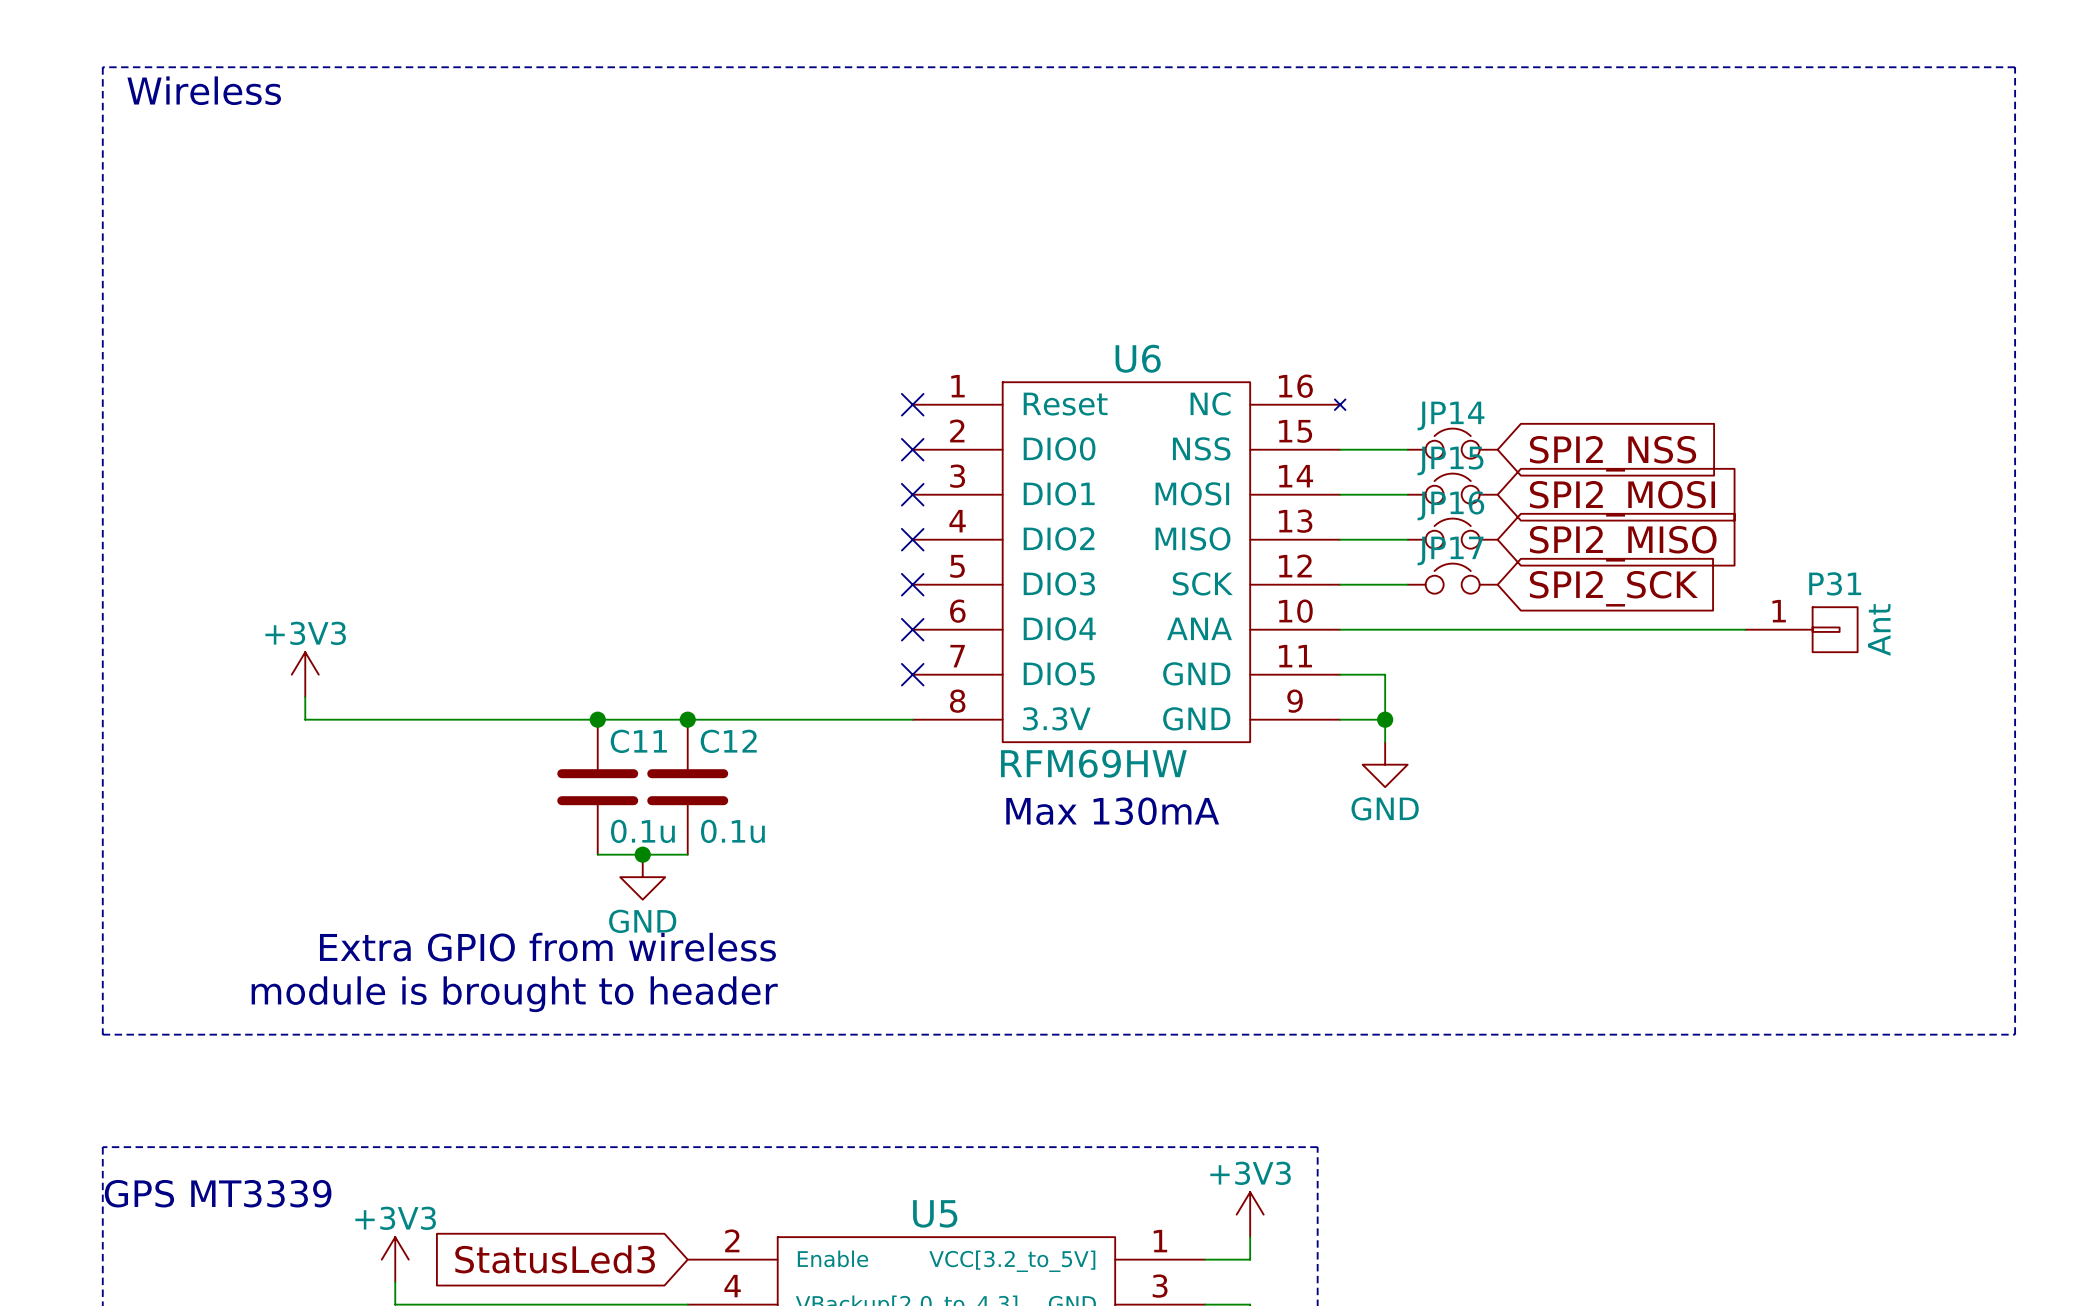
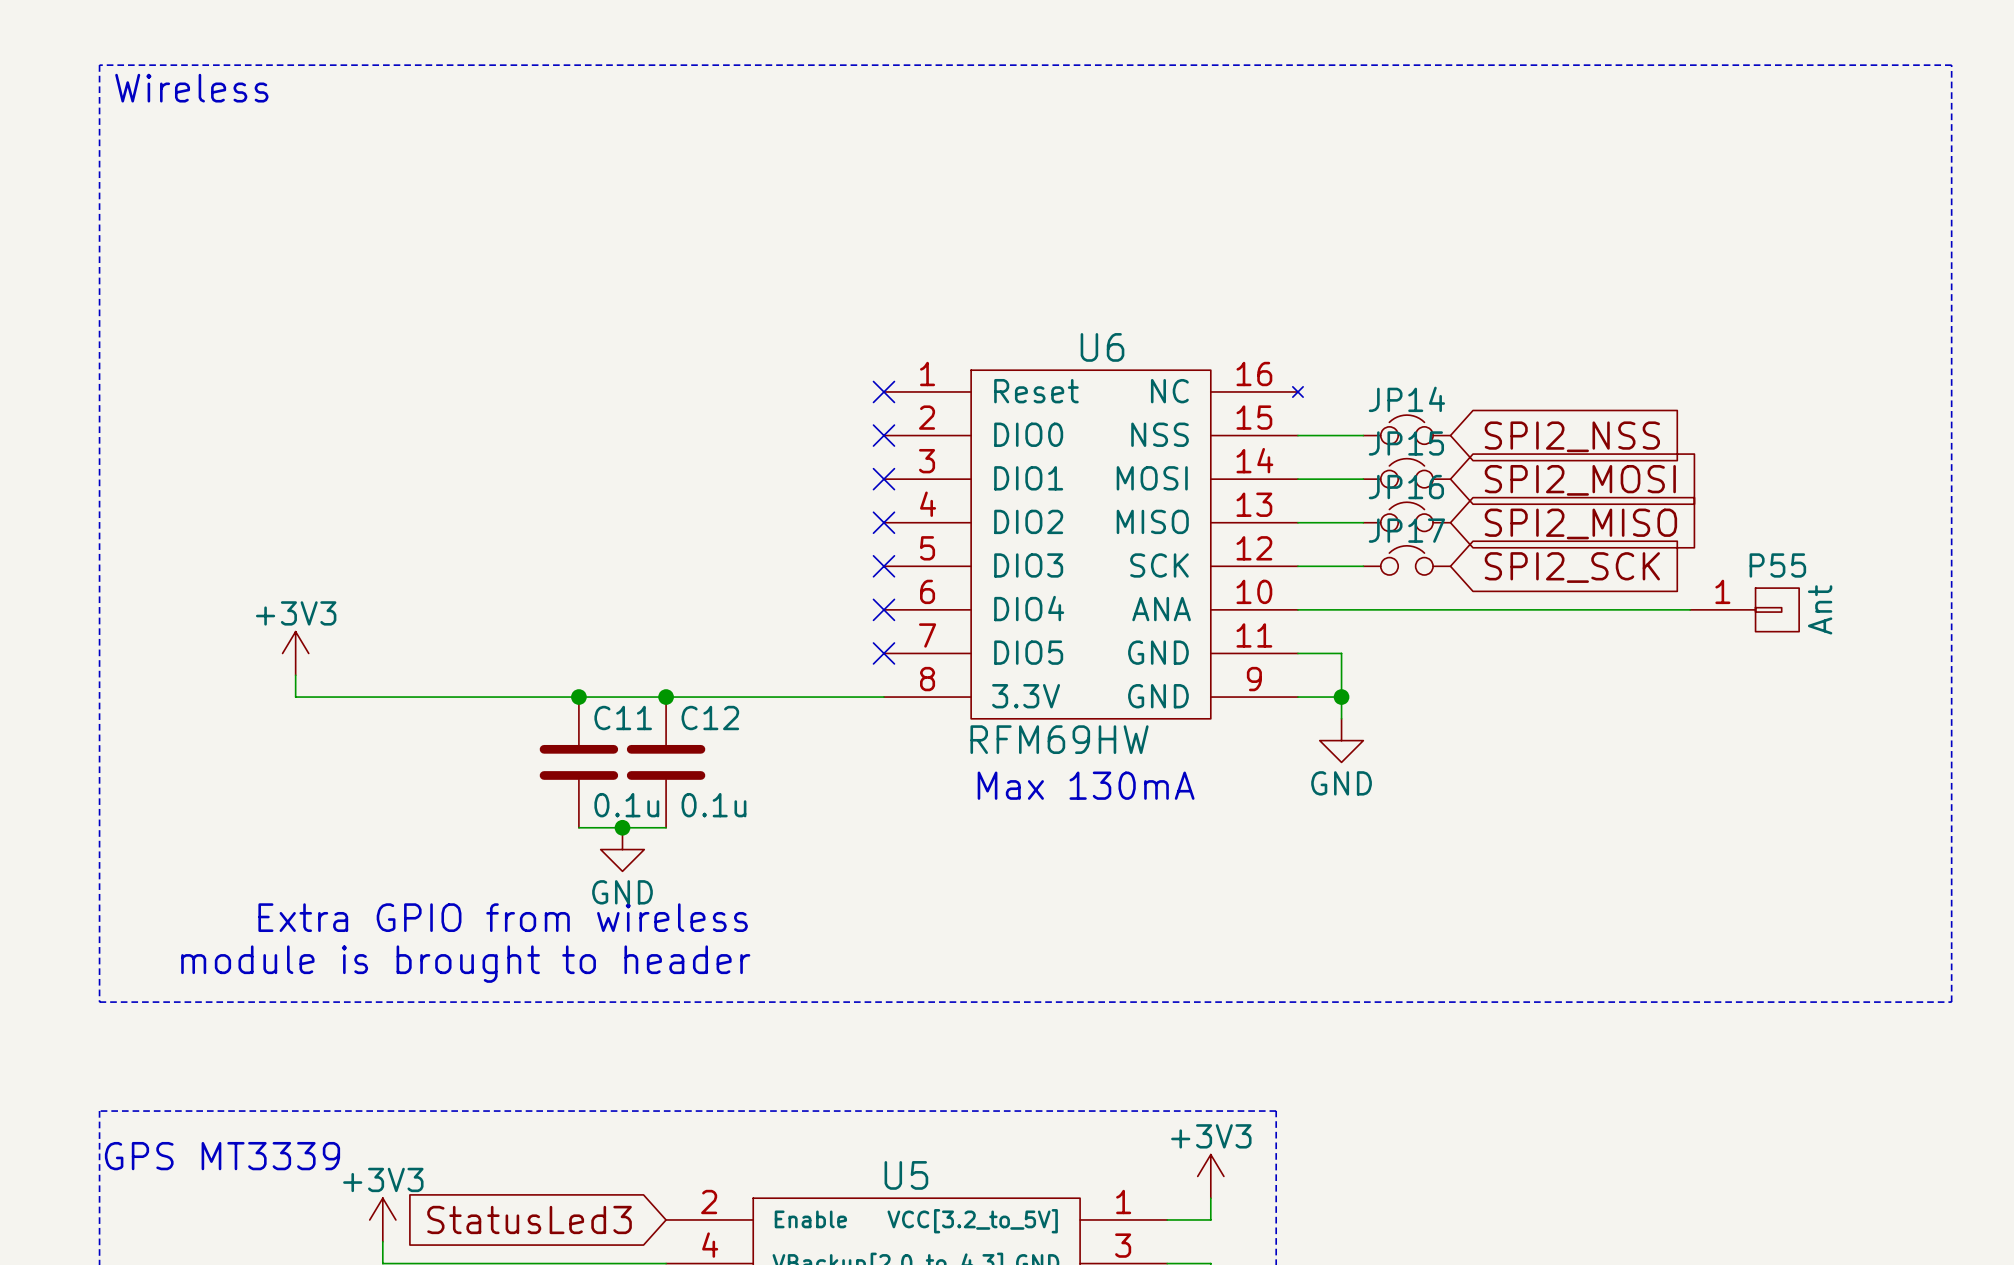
P31 name: P31 (1835, 583) -> P55 (1777, 565)

